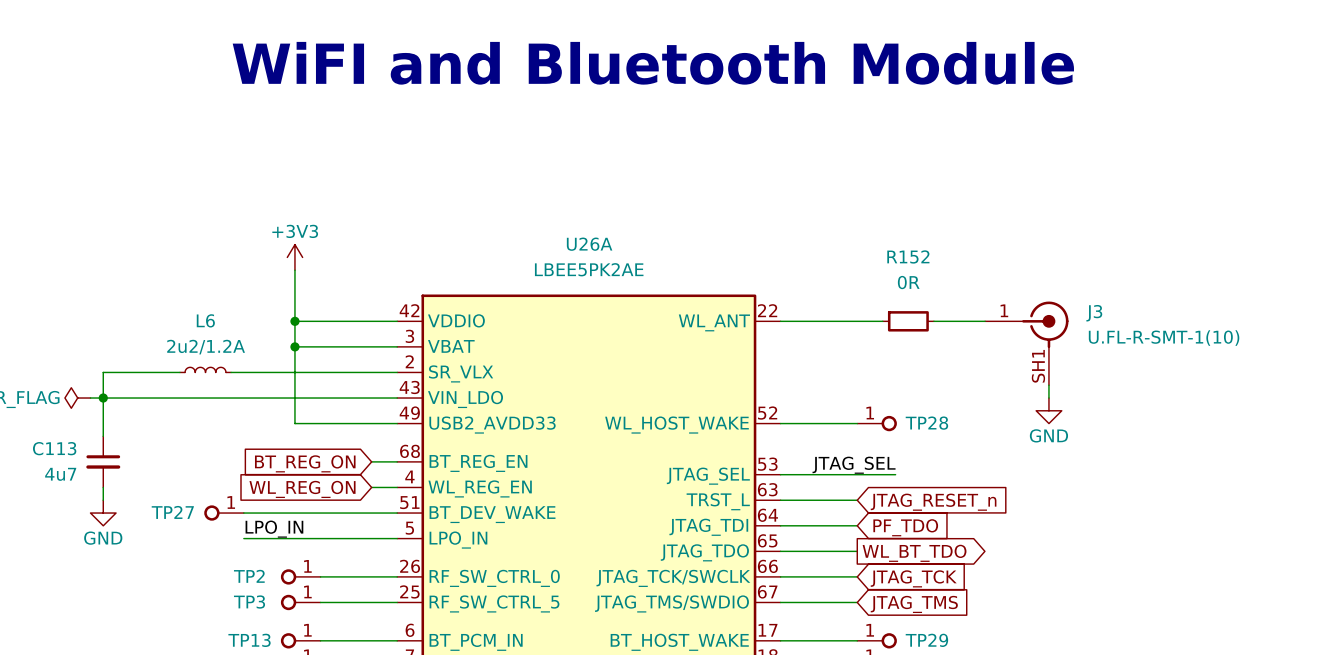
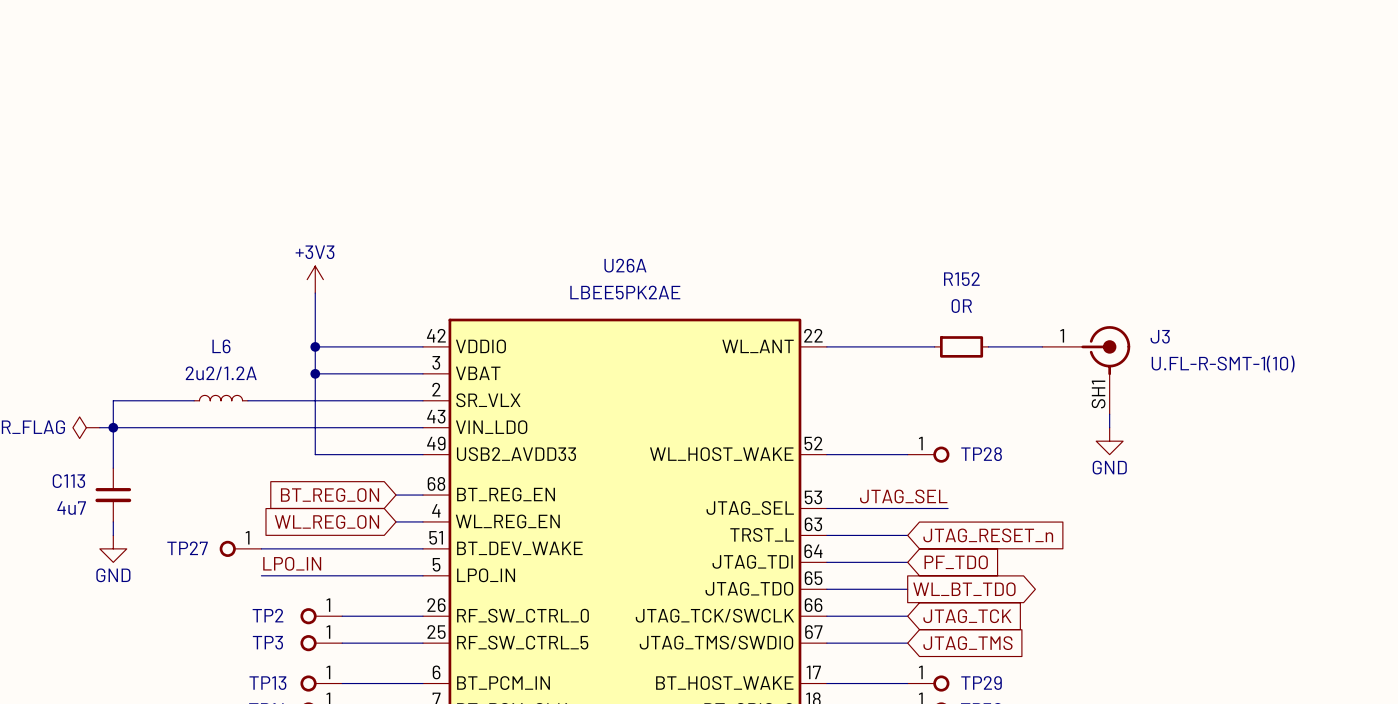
text: WiFI and Bluetooth Module (653, 63) -> none

